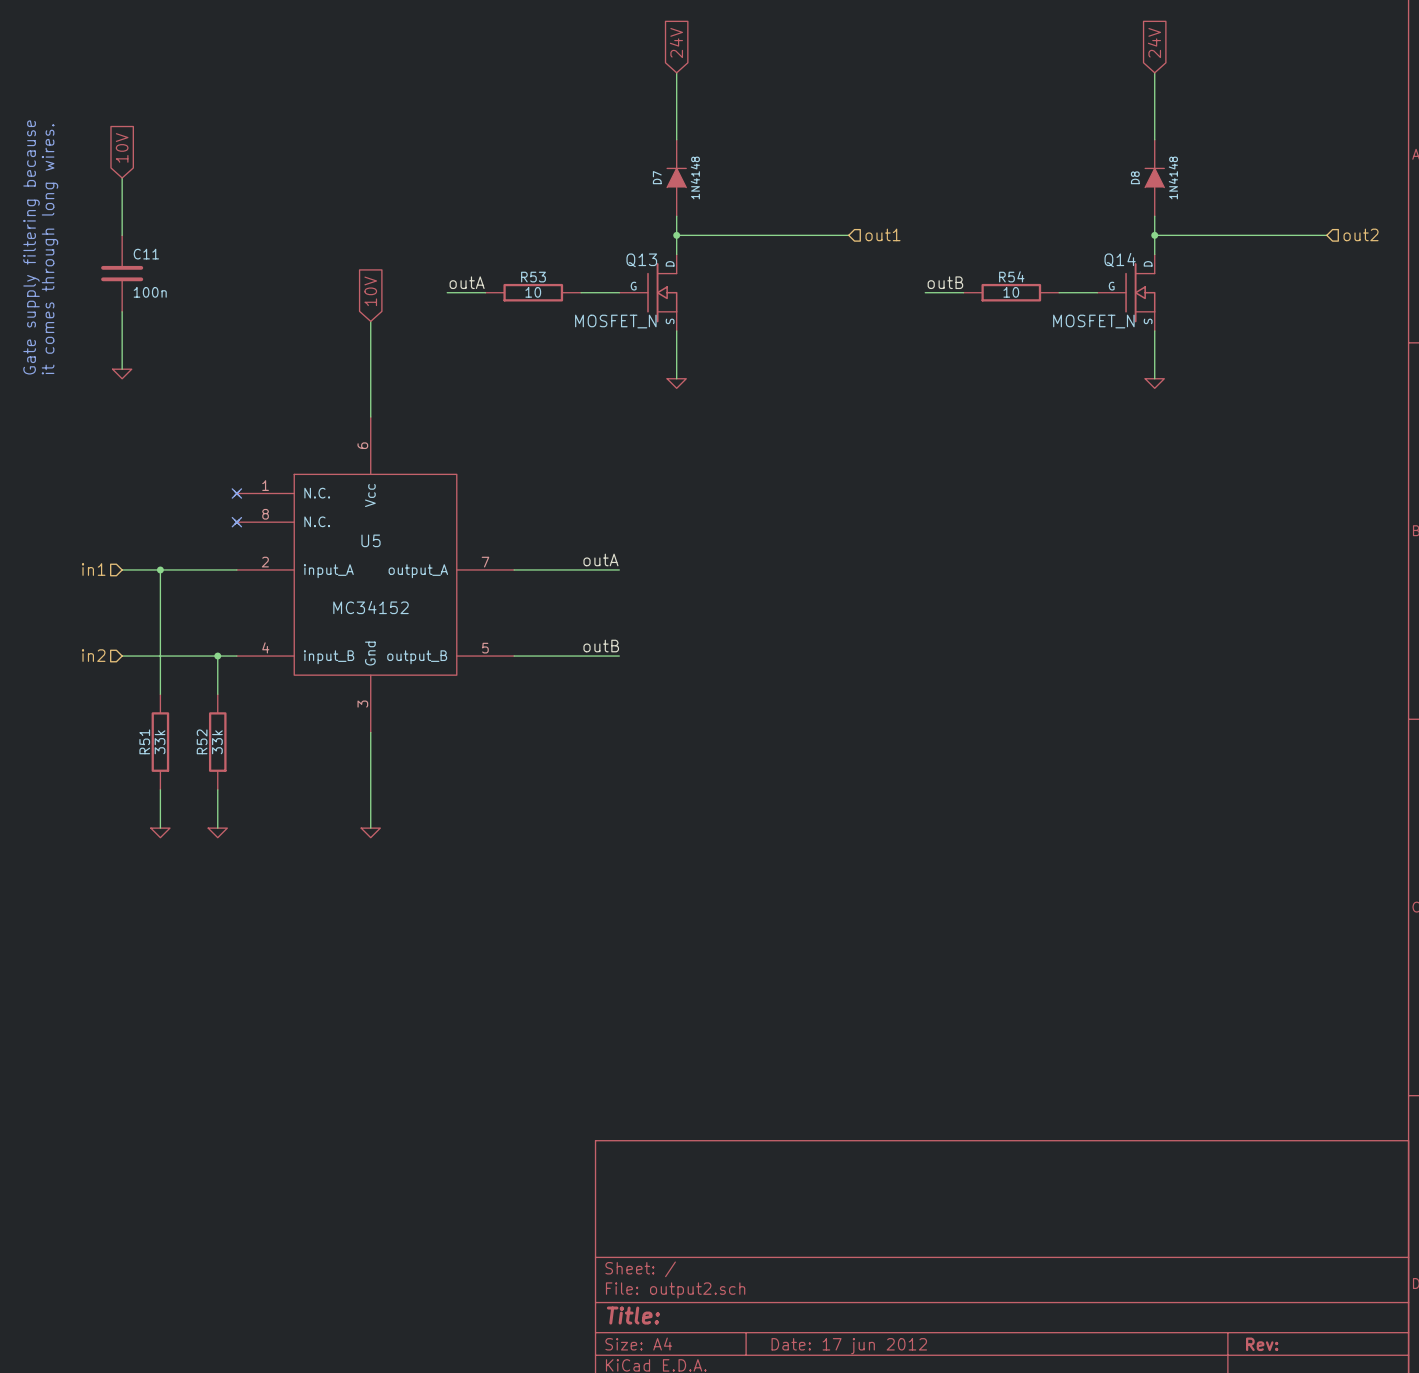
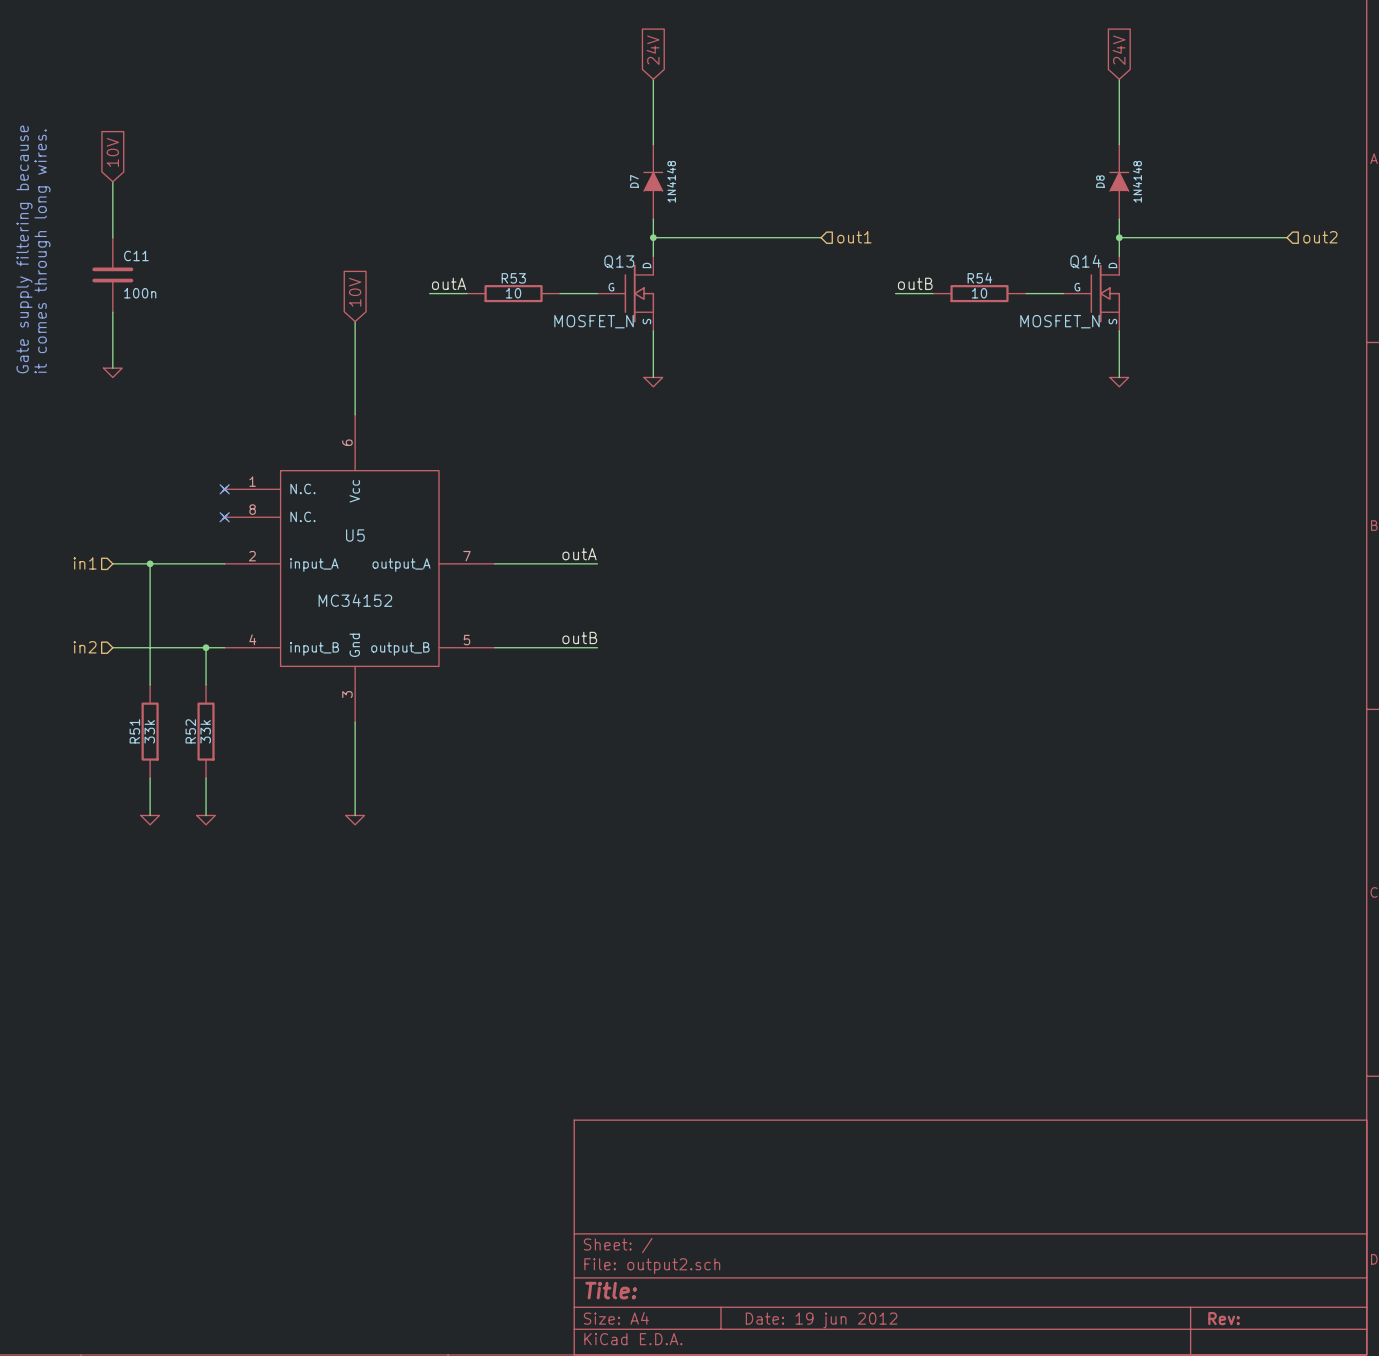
title block: Date: 17 jun 2012 (849, 1346) -> Date: 19 jun 2012 (821, 1320)

